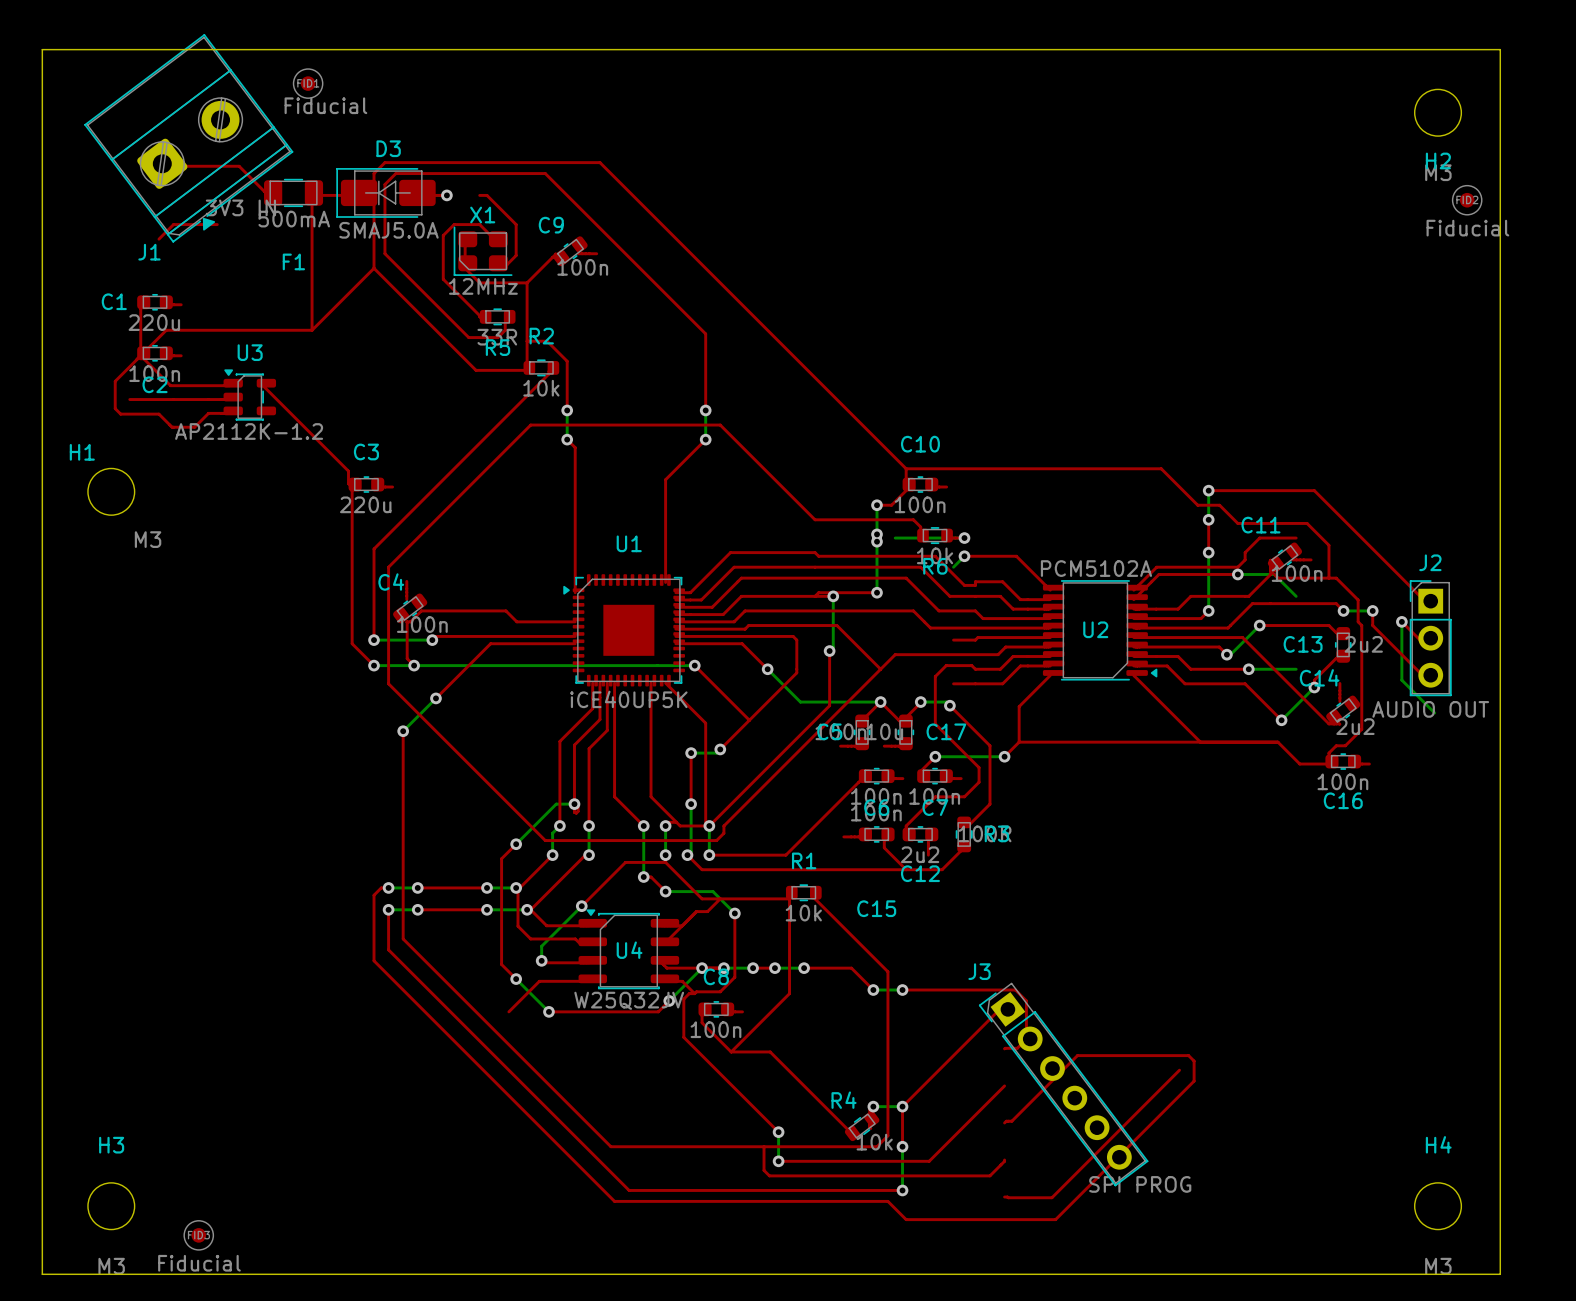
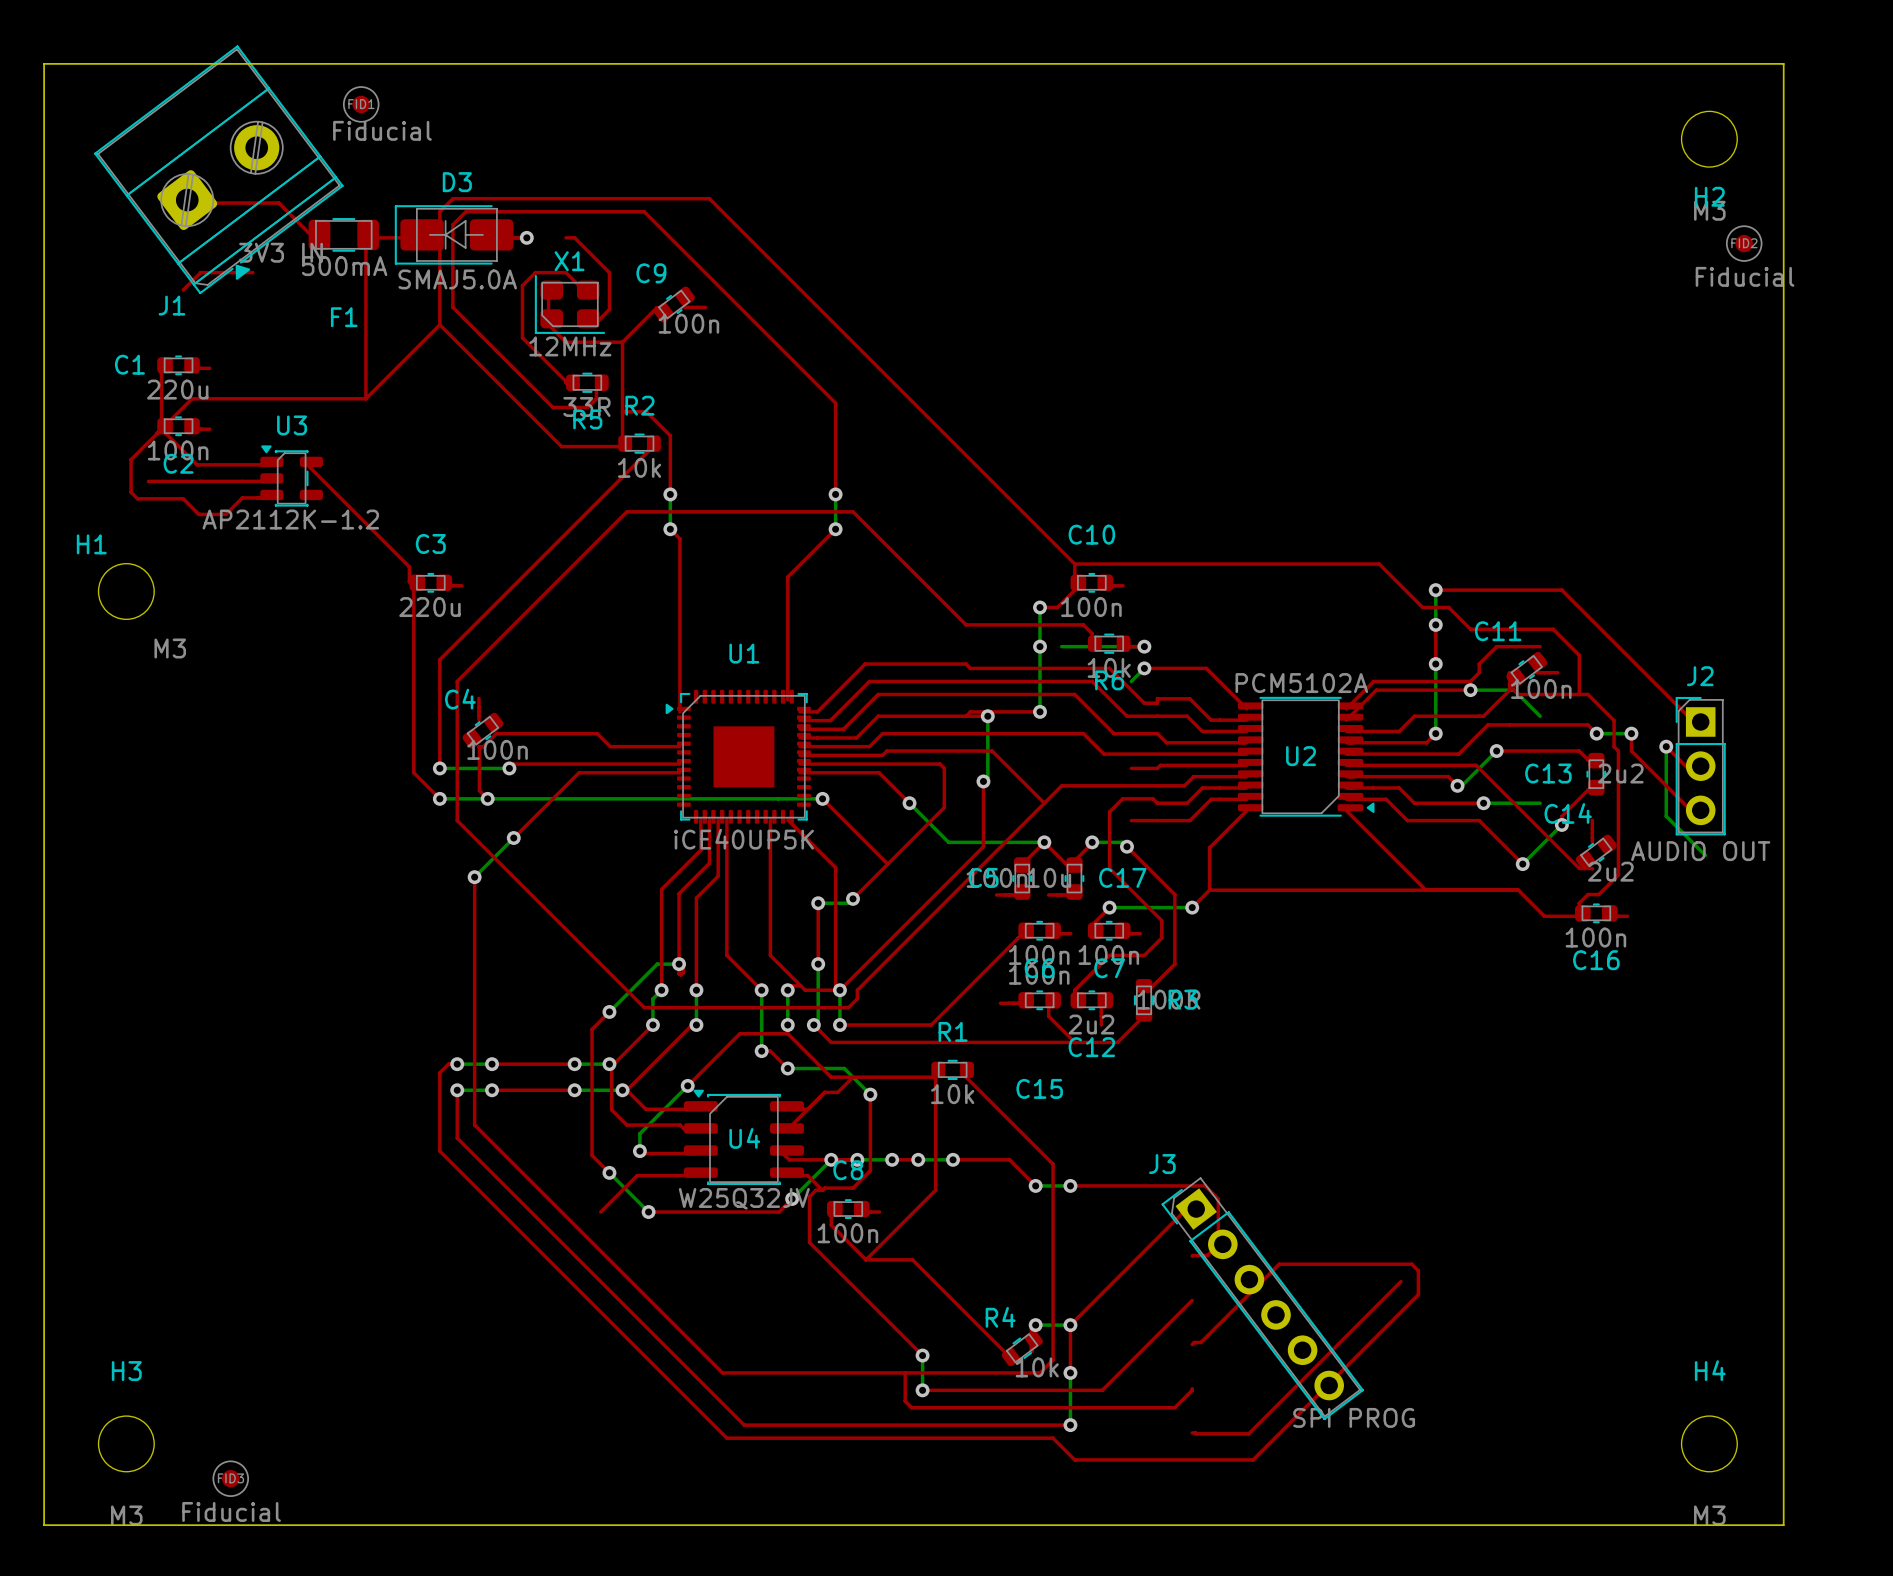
via: (877, 534) -> none
via: none -> (1040, 646)
via: (877, 541) -> none

